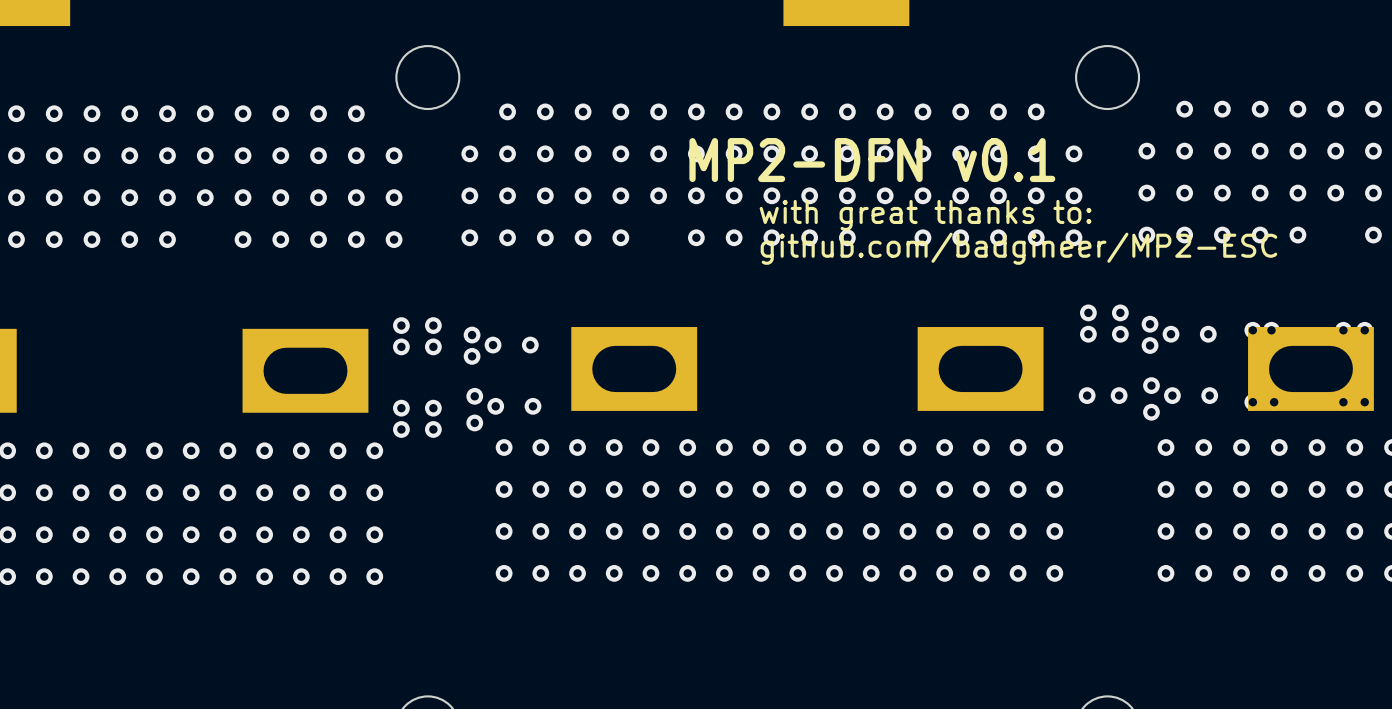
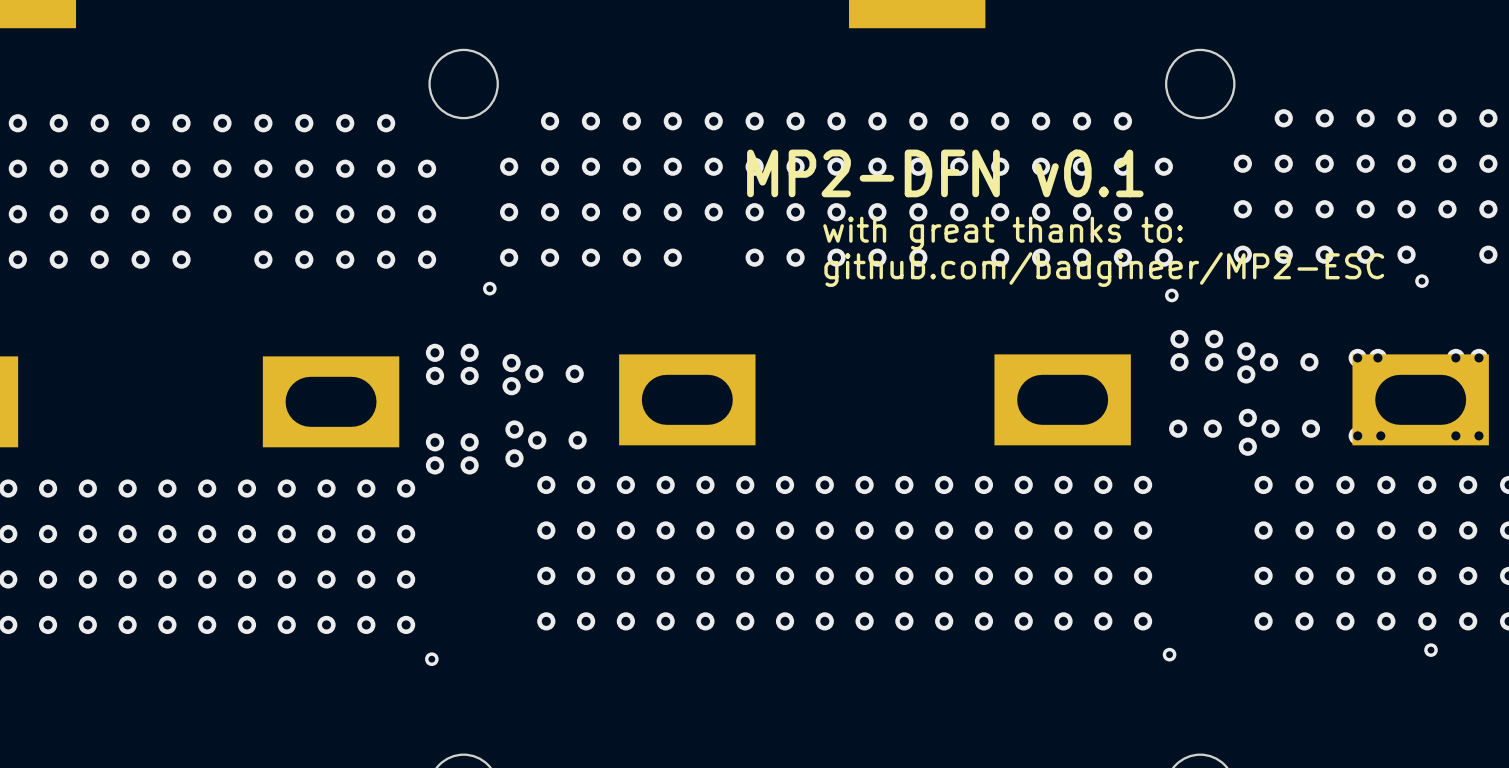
via: none -> (1421, 281)
via: none -> (489, 288)
via: none -> (1171, 295)
via: none -> (1431, 650)
via: none -> (1169, 654)
via: none -> (431, 659)

